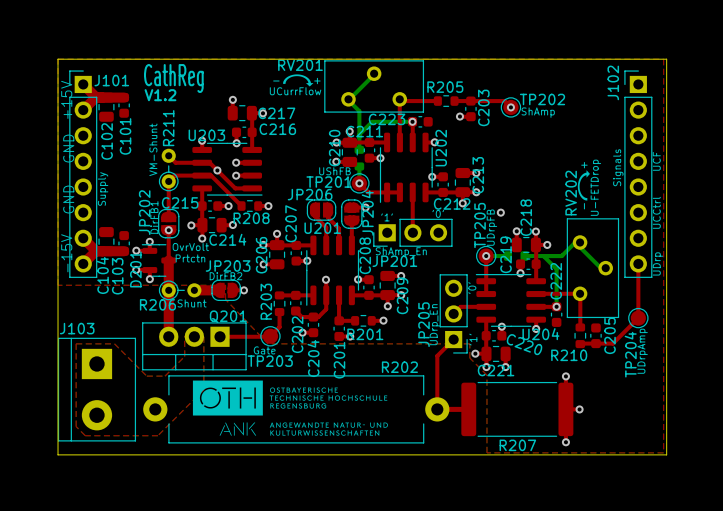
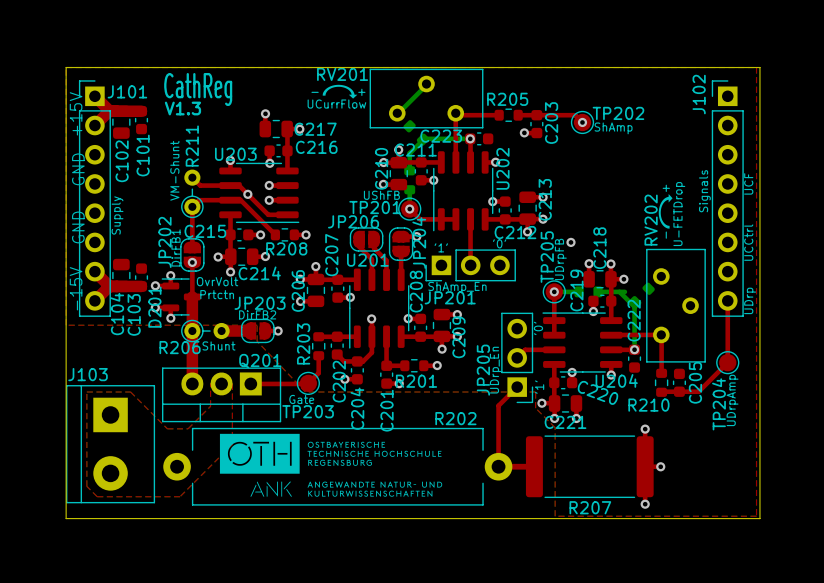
text: V1.2 (160, 95) -> V1.3 (182, 108)
bottom track: (348, 100) (359, 111) (359, 134) -> none
part: none -> (416, 132)
bottom track: (548, 256) (561, 256) (575, 242) (600, 268) -> none
part: none -> (641, 295)

